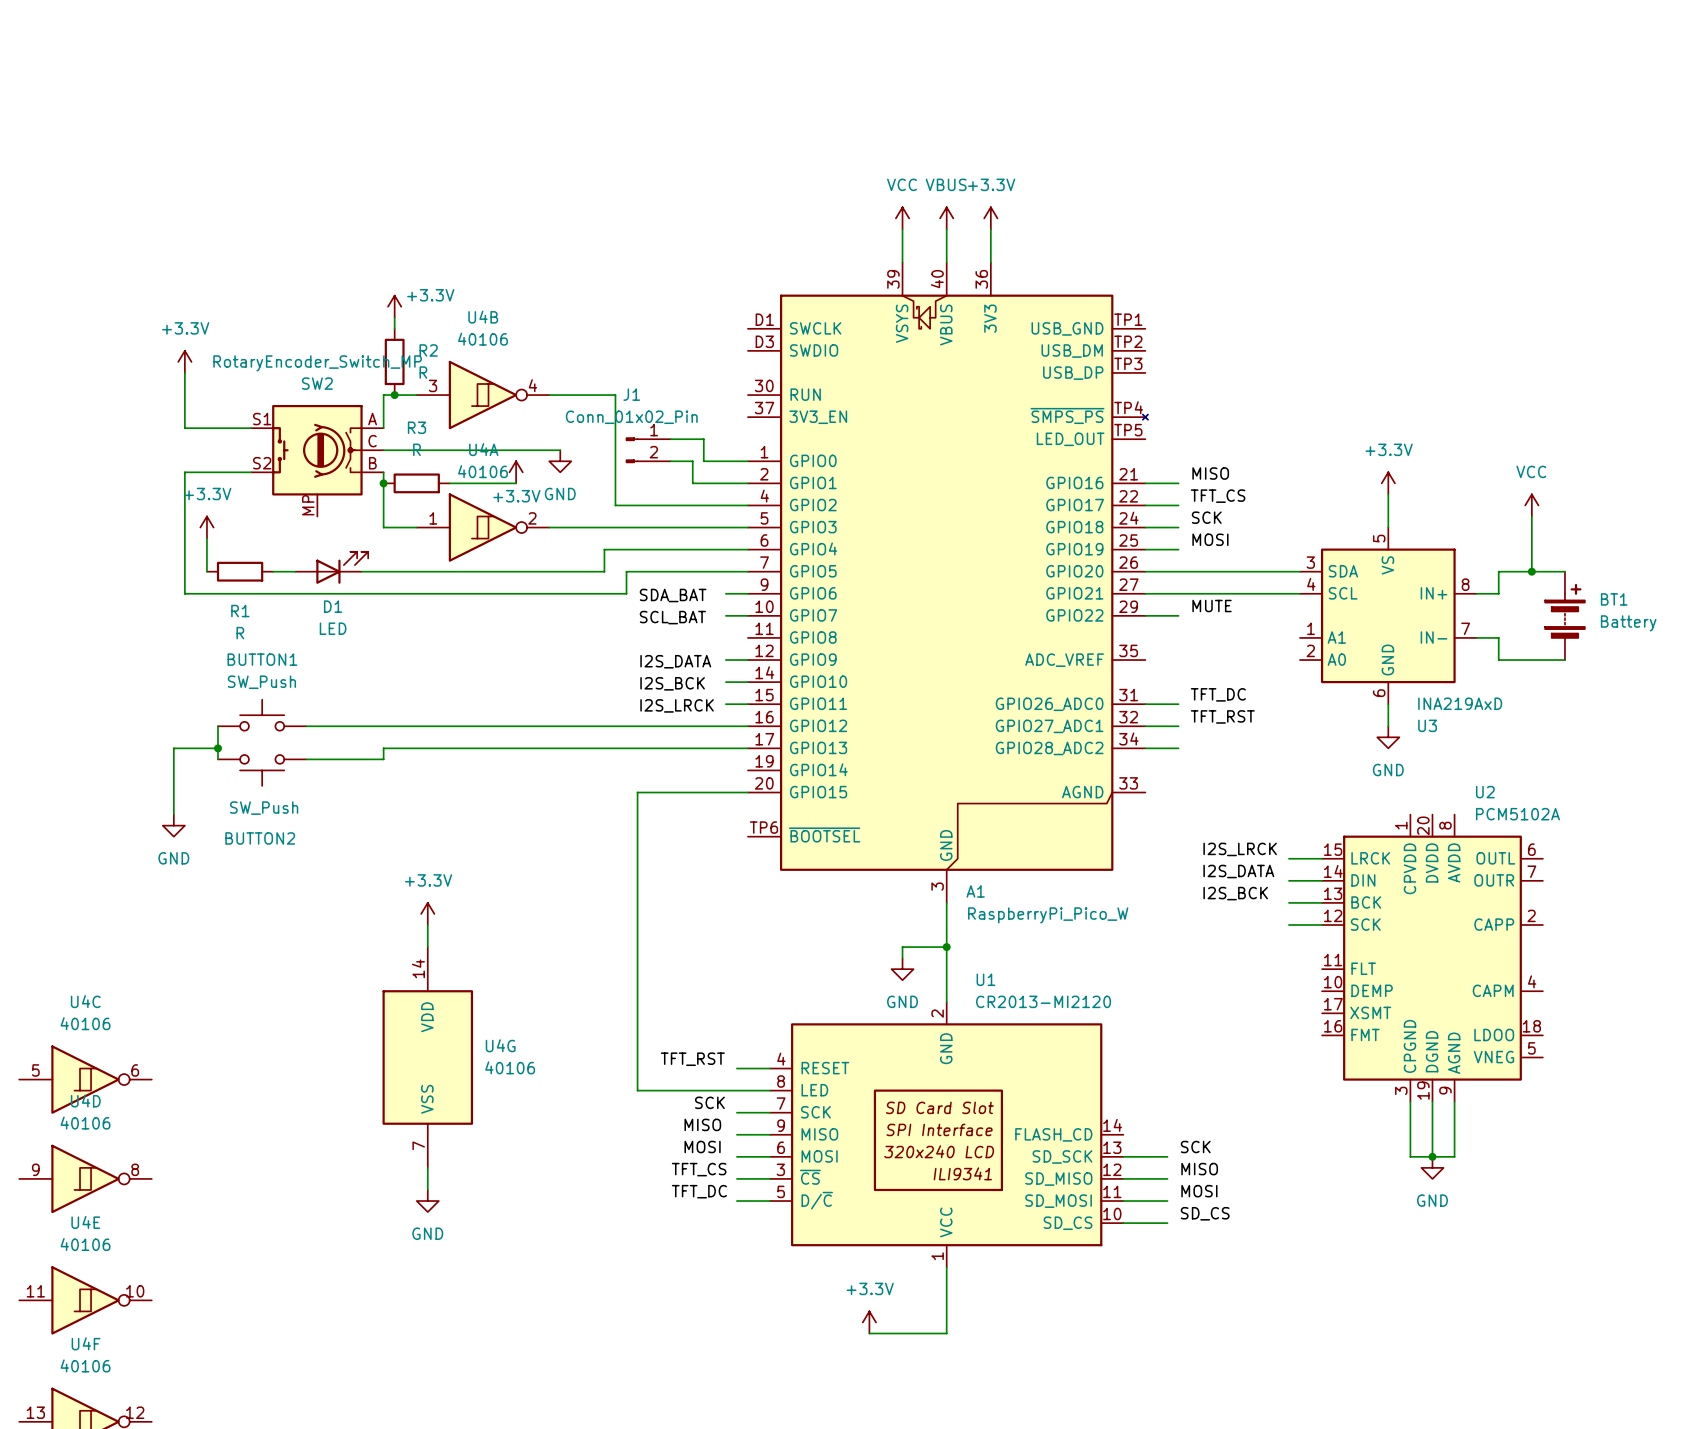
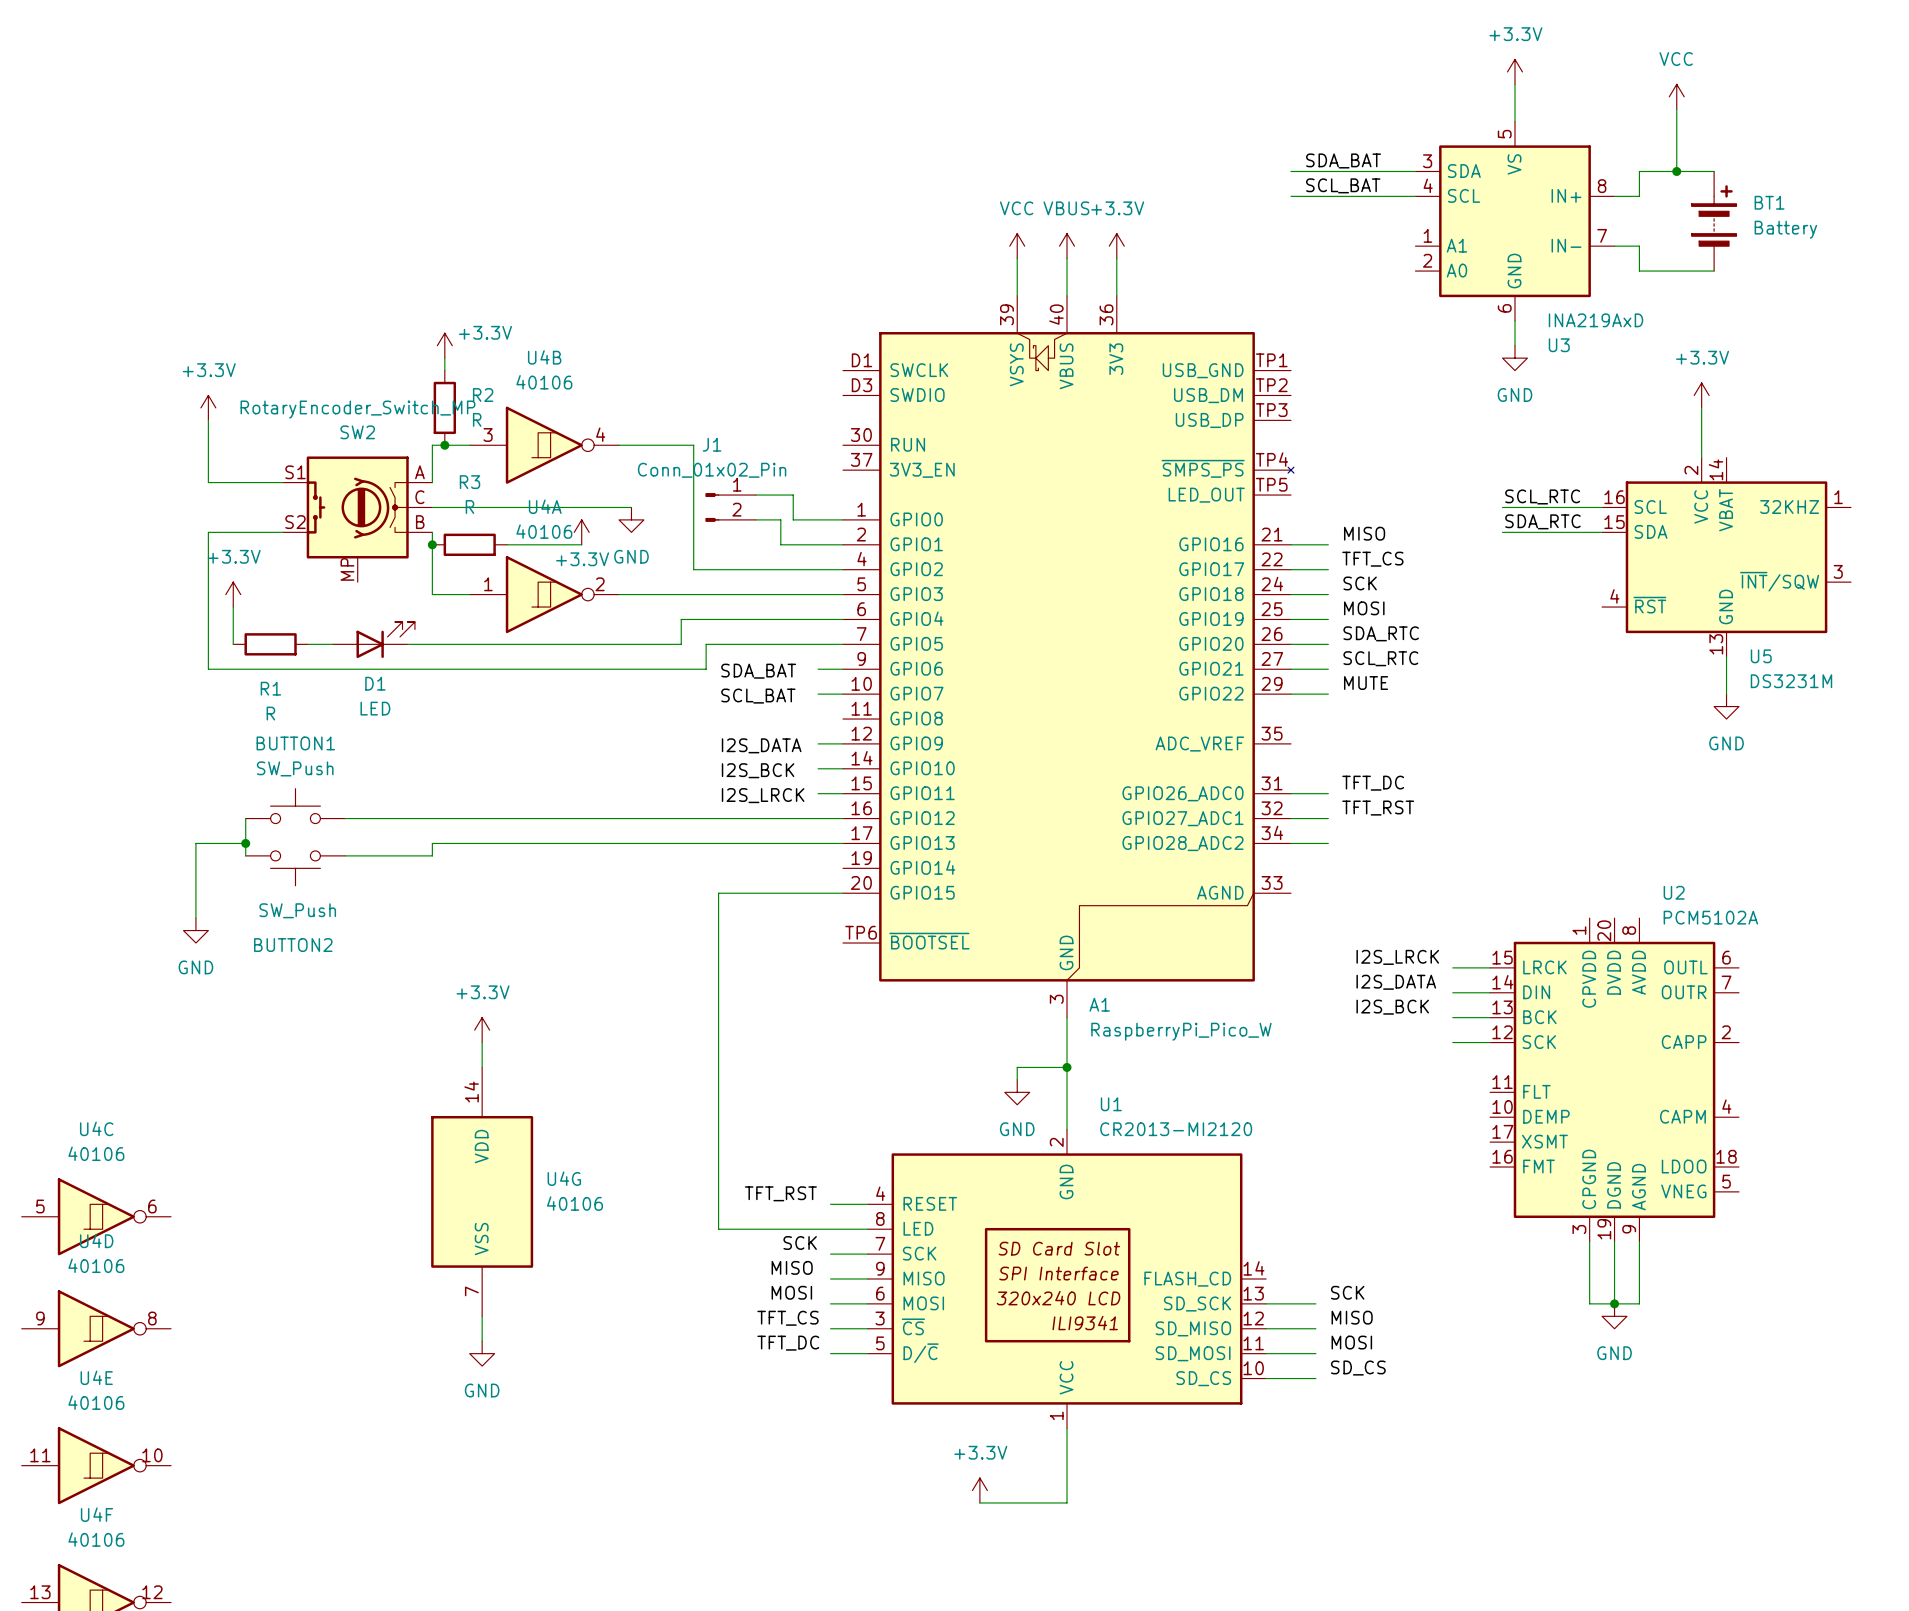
power symbol: none -> +3.3V (1514, 71)
wire: none -> (1514, 84) (1514, 121)
power symbol: none -> VCC (1676, 96)
wire: none -> (1676, 109) (1676, 171)
label: none -> SDA_BAT (1343, 160)
wire: none -> (1291, 171) (1415, 171)
junction: none -> (1676, 171)
wire: none -> (1714, 171) (1639, 171) (1639, 196) (1614, 196)
label: none -> SCL_BAT (1343, 185)
wire: none -> (1291, 196) (1415, 196)
wire: none -> (1614, 246) (1639, 246) (1639, 271) (1714, 271)
wire: none -> (1514, 320) (1514, 345)
power symbol: none -> GND (1514, 358)
wire: none -> (1701, 407) (1701, 457)
label: none -> SCL_RTC (1542, 496)
wire: none -> (1502, 507) (1602, 507)
label: none -> SDA_RTC (1542, 521)
wire: none -> (1502, 532) (1602, 532)
power symbol position: +3.3V (1388, 483) -> +3.3V (1701, 395)
wire: (1388, 494) (1388, 527) -> (1726, 656) (1726, 694)
U5: none -> DS3231M (1726, 557)
power symbol: VCC (1531, 505) -> none
label: none -> SDA_RTC (1381, 633)
wire: (1178, 571) (1299, 571) -> none
junction: (1531, 571) -> none
wire: (1564, 571) (1498, 571) (1498, 593) (1476, 593) -> none
label: none -> SCL_RTC (1380, 658)
wire: (1178, 593) (1299, 593) -> none
U3 position: (1388, 615) -> (1514, 221)
BT1 position: (1564, 615) -> (1714, 221)
wire: (1476, 637) (1498, 637) (1498, 660) (1564, 660) -> none
wire: (1388, 704) (1388, 726) -> none
power symbol position: GND (1388, 737) -> GND (1726, 706)

